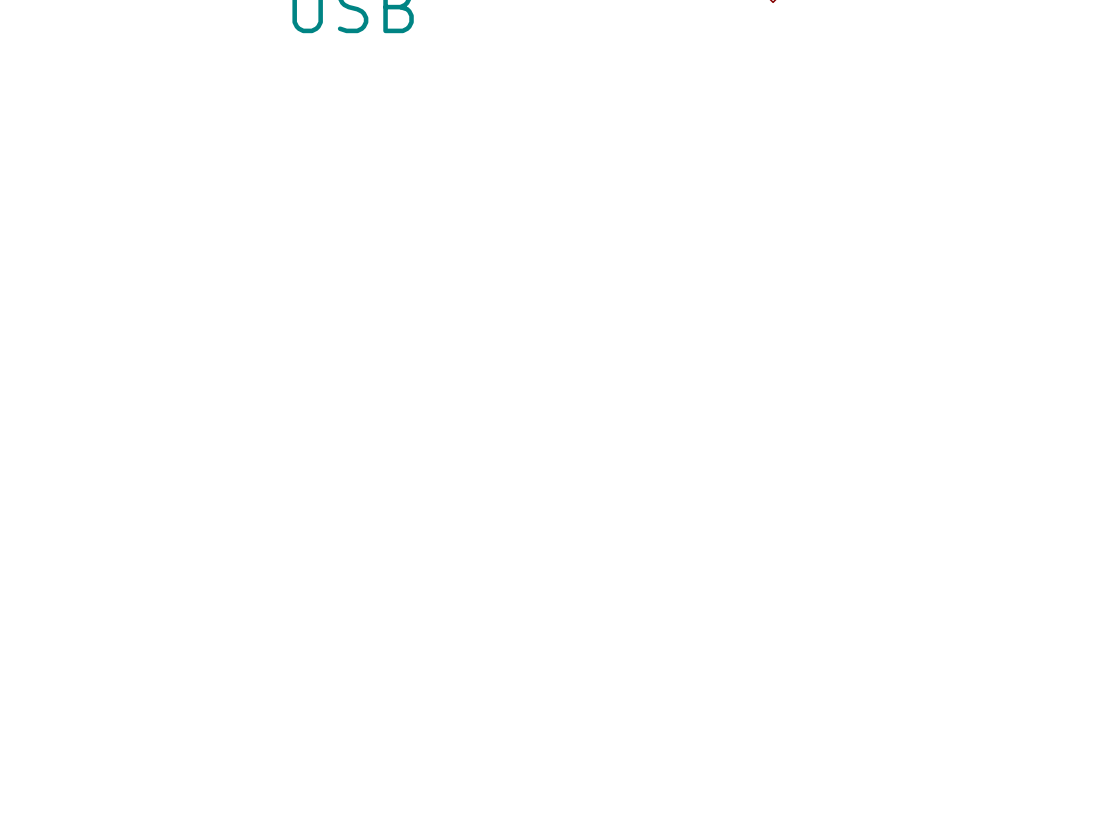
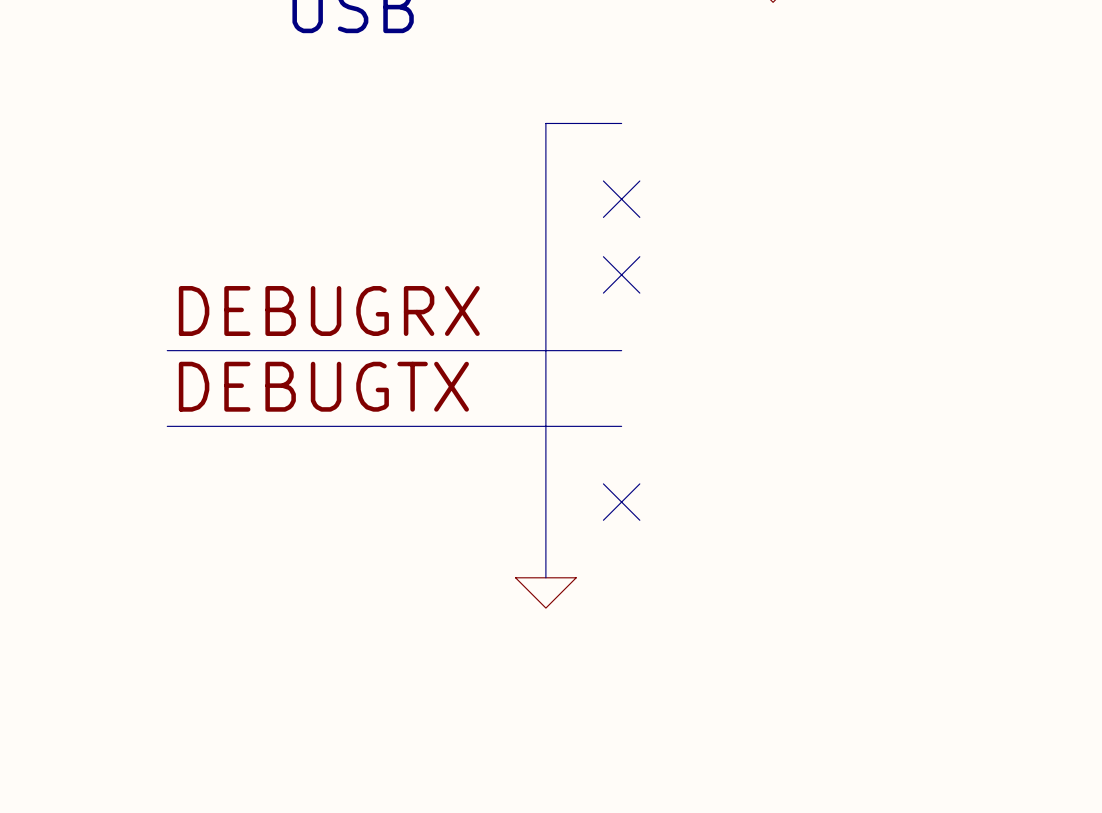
wire: none -> (621, 123) (545, 123) (545, 577)
no-connect mark: none -> (621, 199)
no-connect mark: none -> (621, 274)
label: none -> DEBUGRX (329, 311)
wire: none -> (167, 350) (621, 350)
label: none -> DEBUGTX (323, 386)
wire: none -> (167, 426) (621, 426)
no-connect mark: none -> (621, 502)
power symbol: none -> (545, 592)

